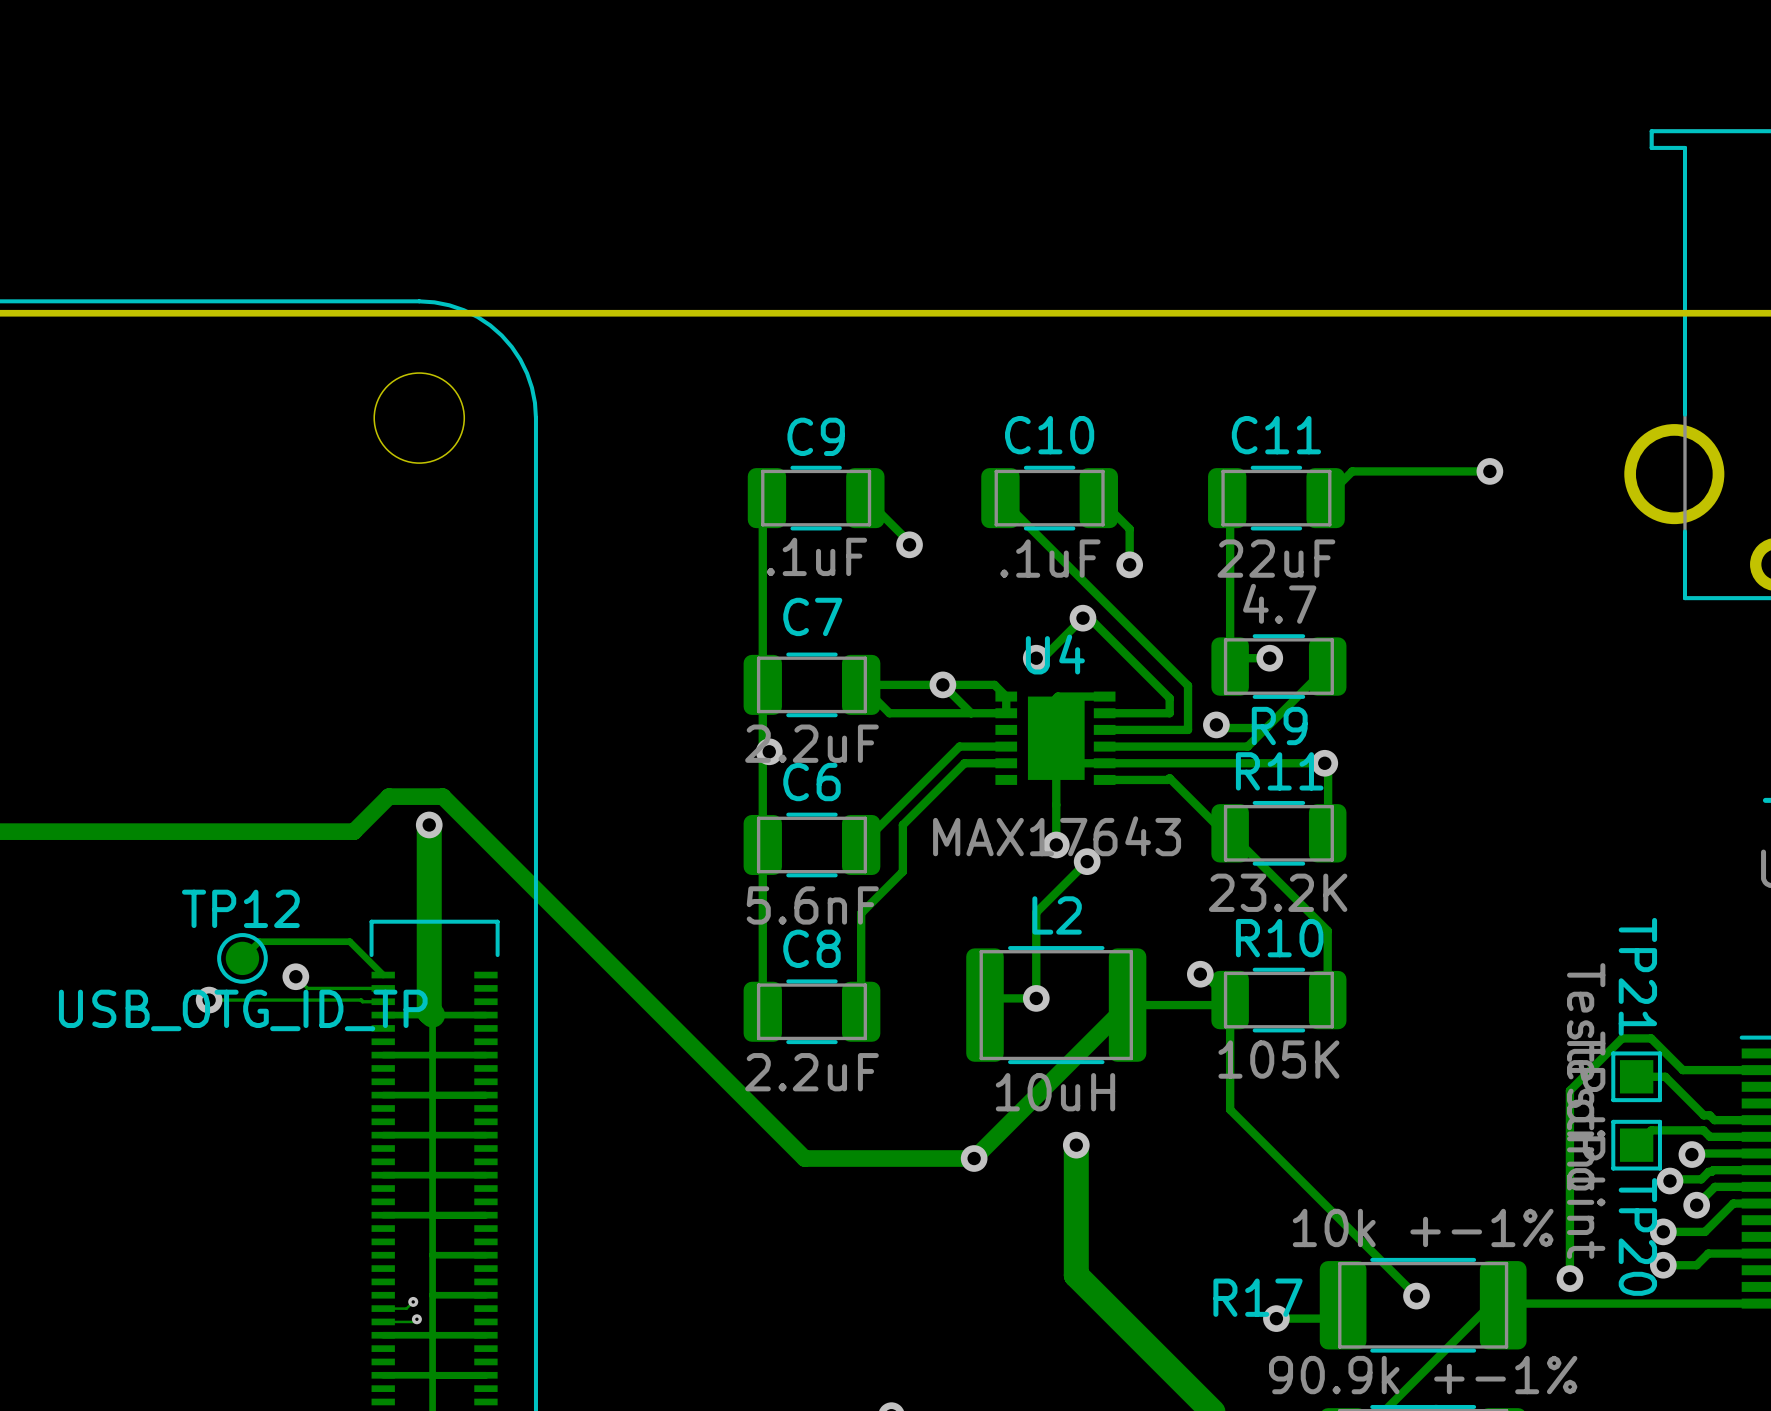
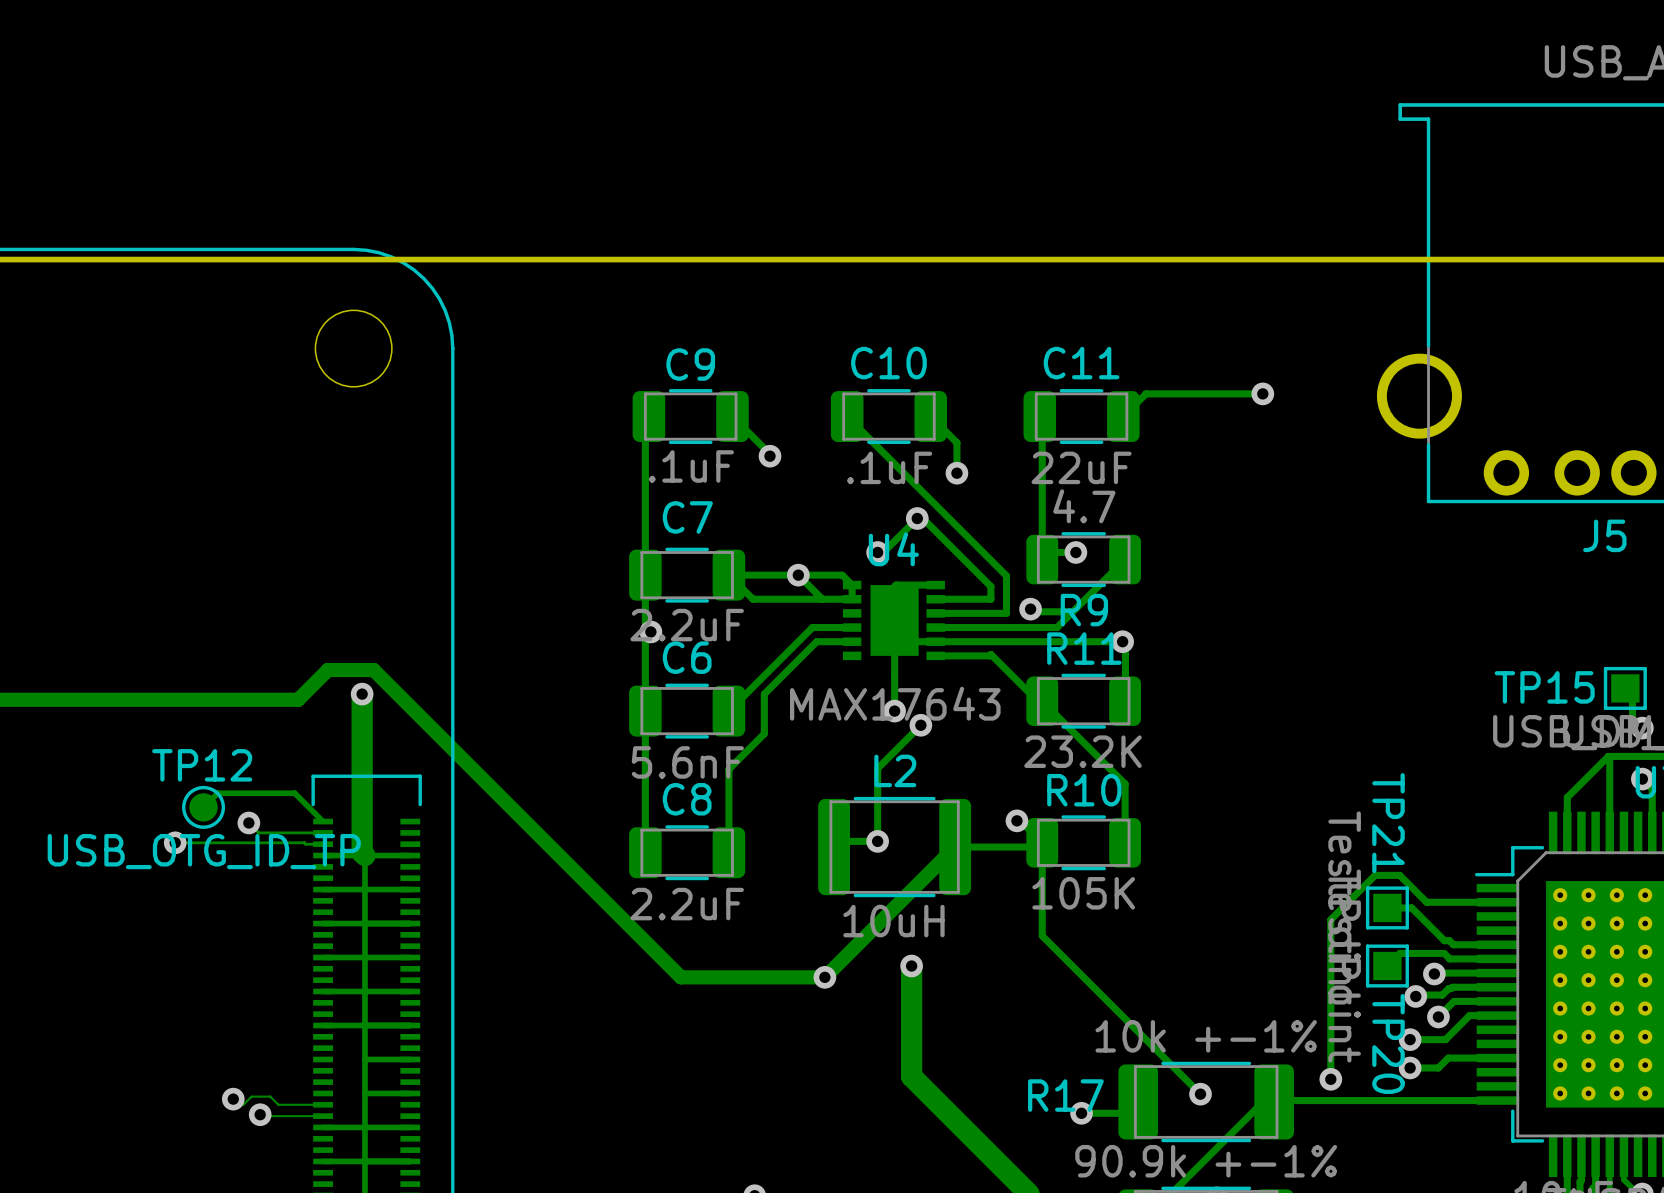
via: none -> (233, 1099)
track: (413, 1301) (406, 1308) (383, 1308) -> (233, 1099) (238, 1104) (243, 1104) (251, 1096) (270, 1096) (278, 1104) (323, 1104)
via: (413, 1301) -> none
track: (416, 1319) (414, 1321) (383, 1321) -> (260, 1114) (323, 1116)
via: (416, 1319) -> none
via: none -> (260, 1114)

